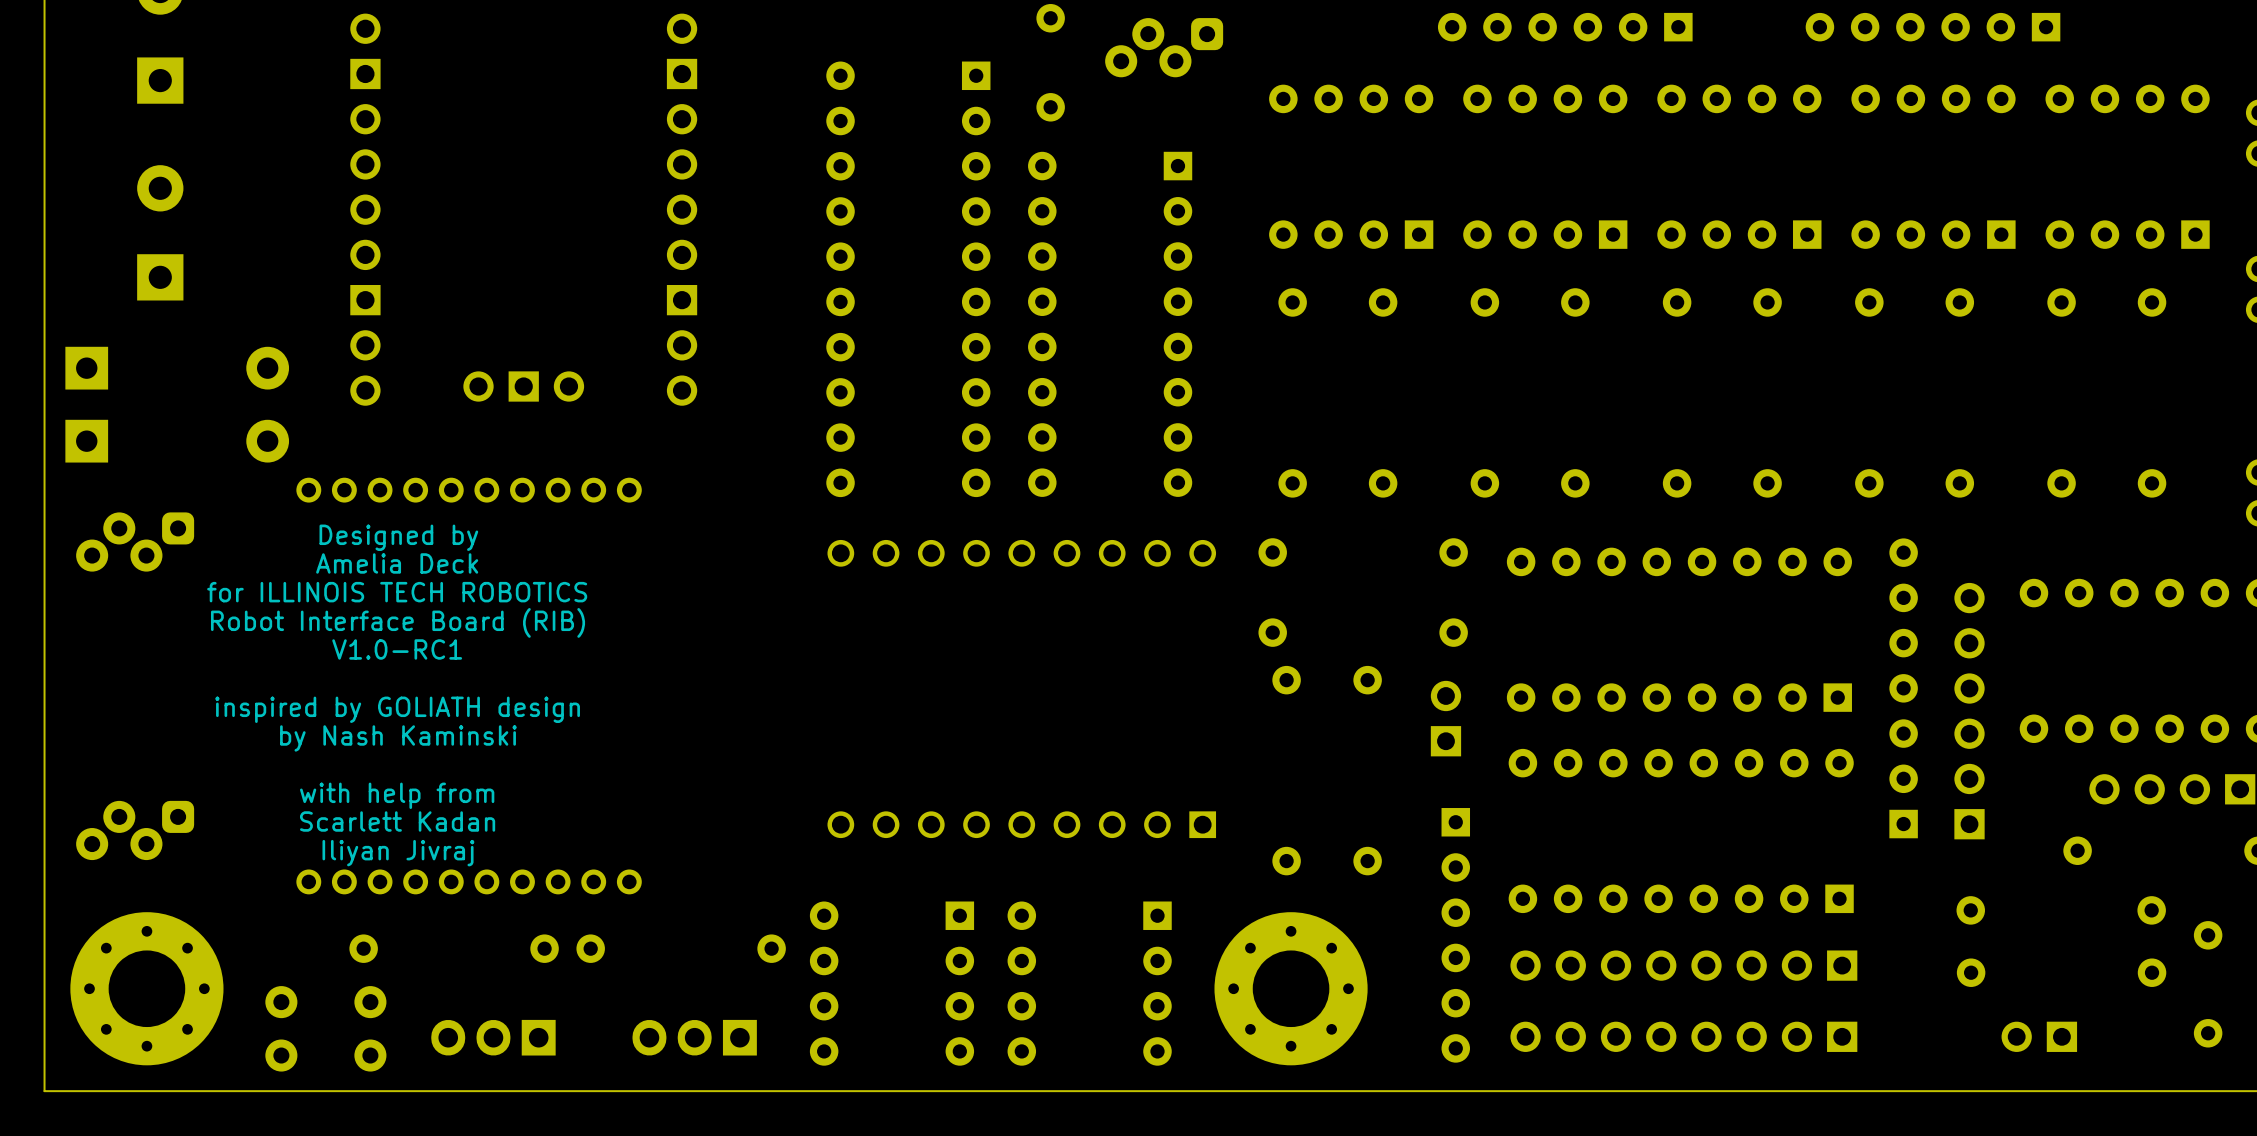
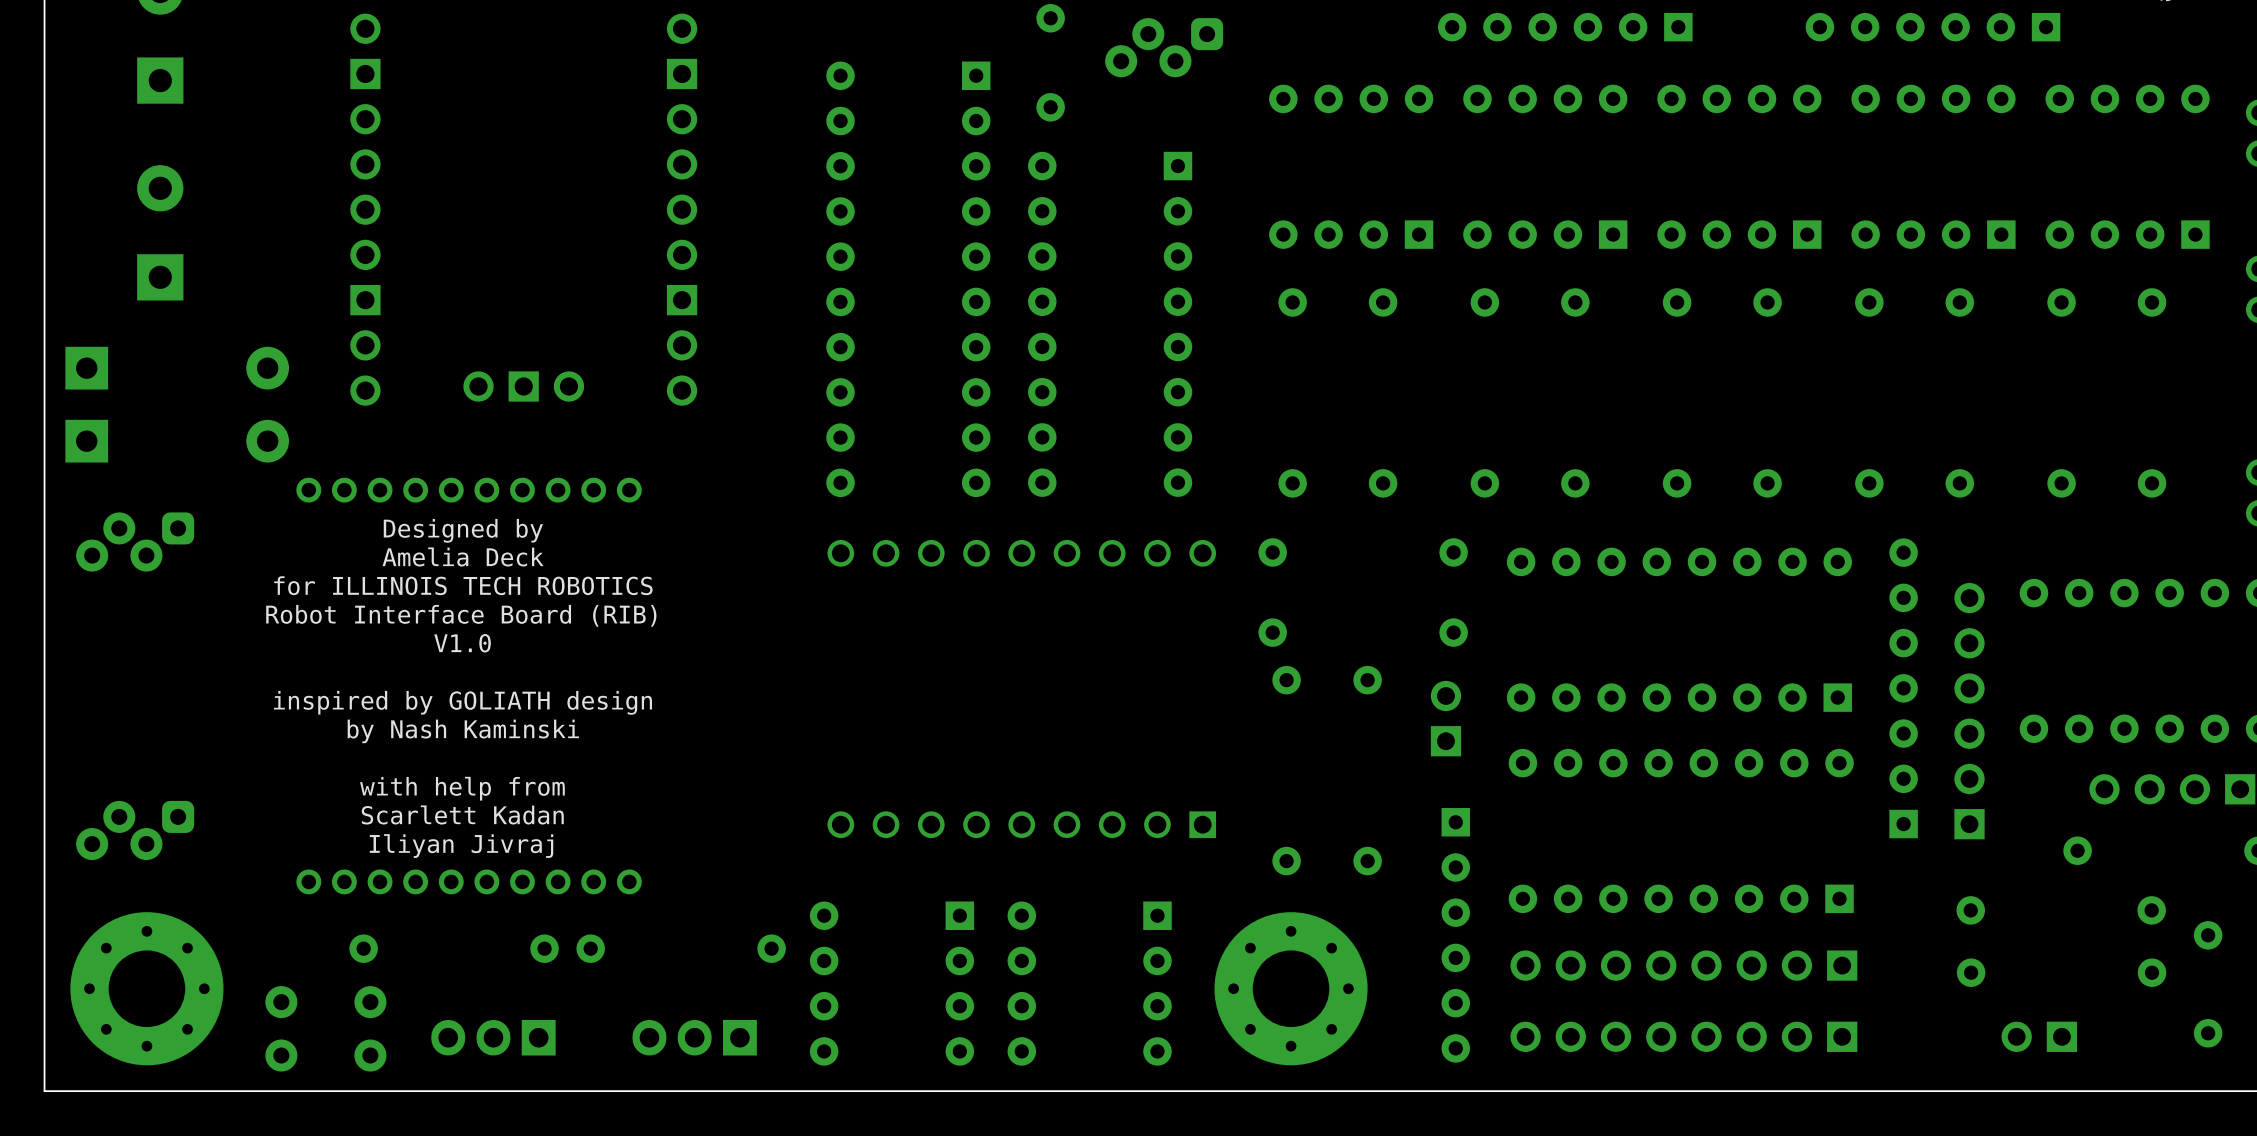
text position: Designed by (398, 537) -> Designed by (463, 530)
text position: Amelia Deck (397, 563) -> Amelia Deck (463, 556)
text position: for ILLINOIS TECH ROBOTICS (397, 592) -> for ILLINOIS TECH ROBOTICS (463, 585)
text position: Robot Interface Board (RIB) (398, 622) -> Robot Interface Board (RIB) (461, 615)
text: V1.0-RC1 (397, 649) -> V1.0 (462, 643)
text position: inspired by GOLIATH design (397, 709) -> inspired by GOLIATH design (462, 702)
text position: by Nash Kaminski (398, 738) -> by Nash Kaminski (463, 731)
text position: with help from (397, 795) -> with help from (462, 788)
text position: Scarlett Kadan (397, 821) -> Scarlett Kadan (462, 814)
text position: Iliyan Jivraj (398, 853) -> Iliyan Jivraj (461, 846)

